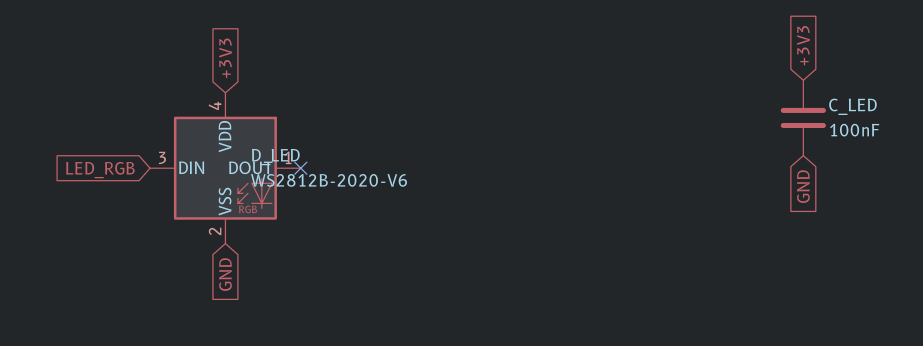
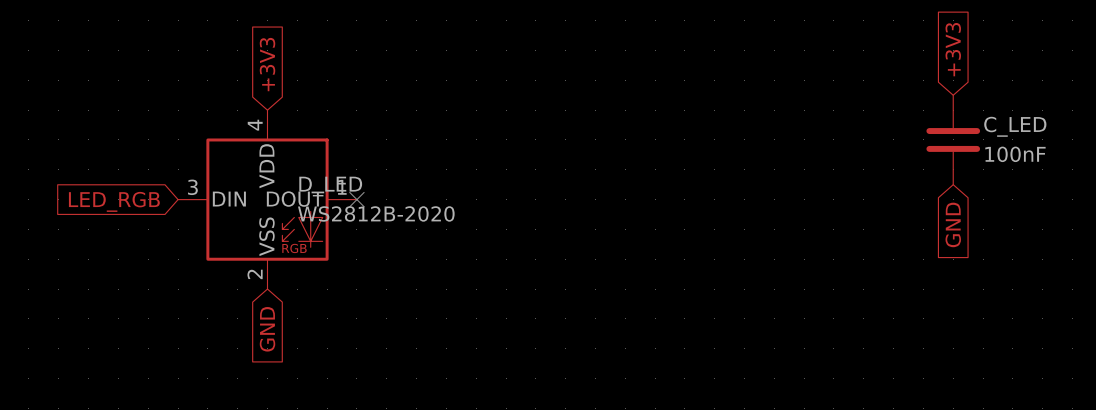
D_LED value: WS2812B-2020-V6 (329, 180) -> WS2812B-2020 (376, 213)

